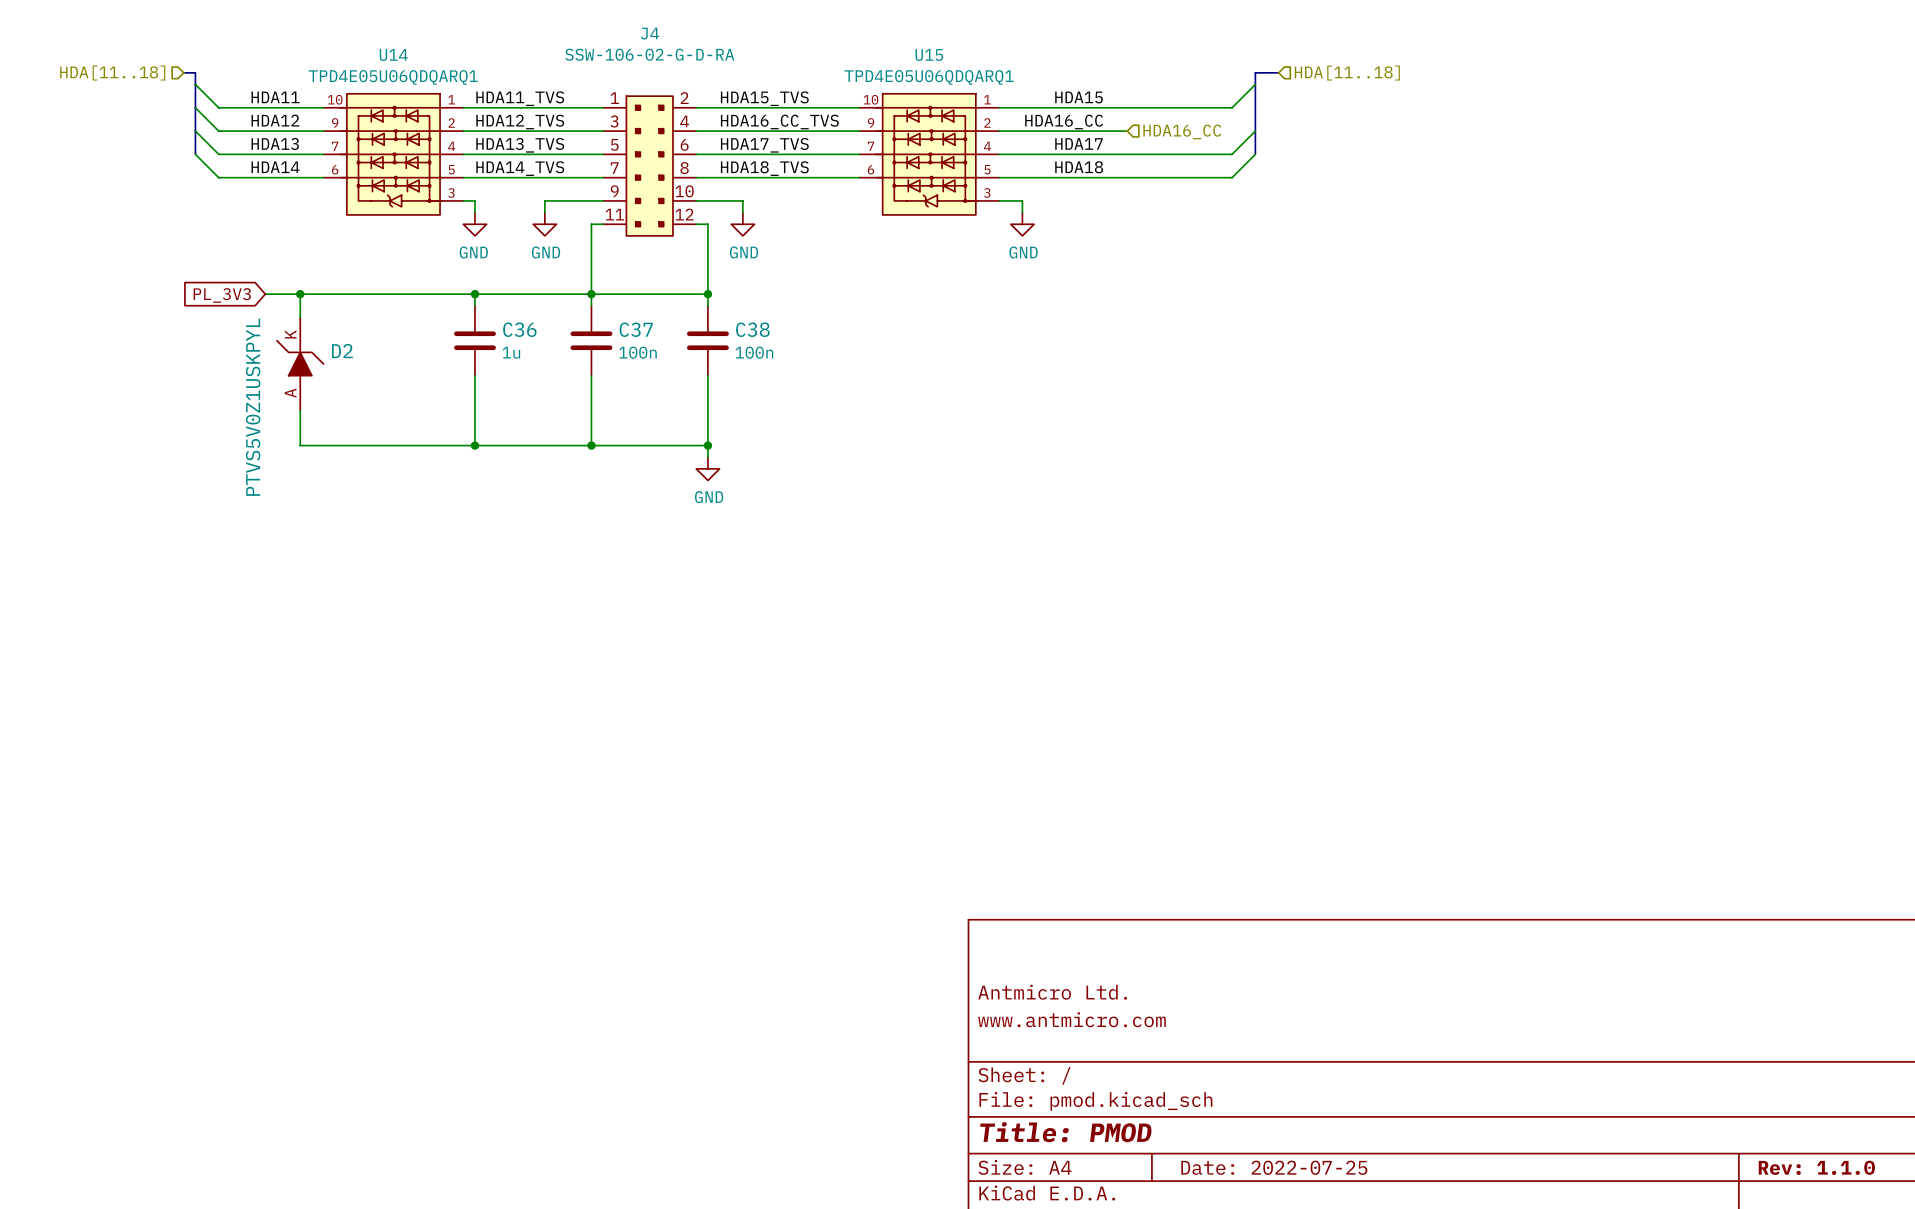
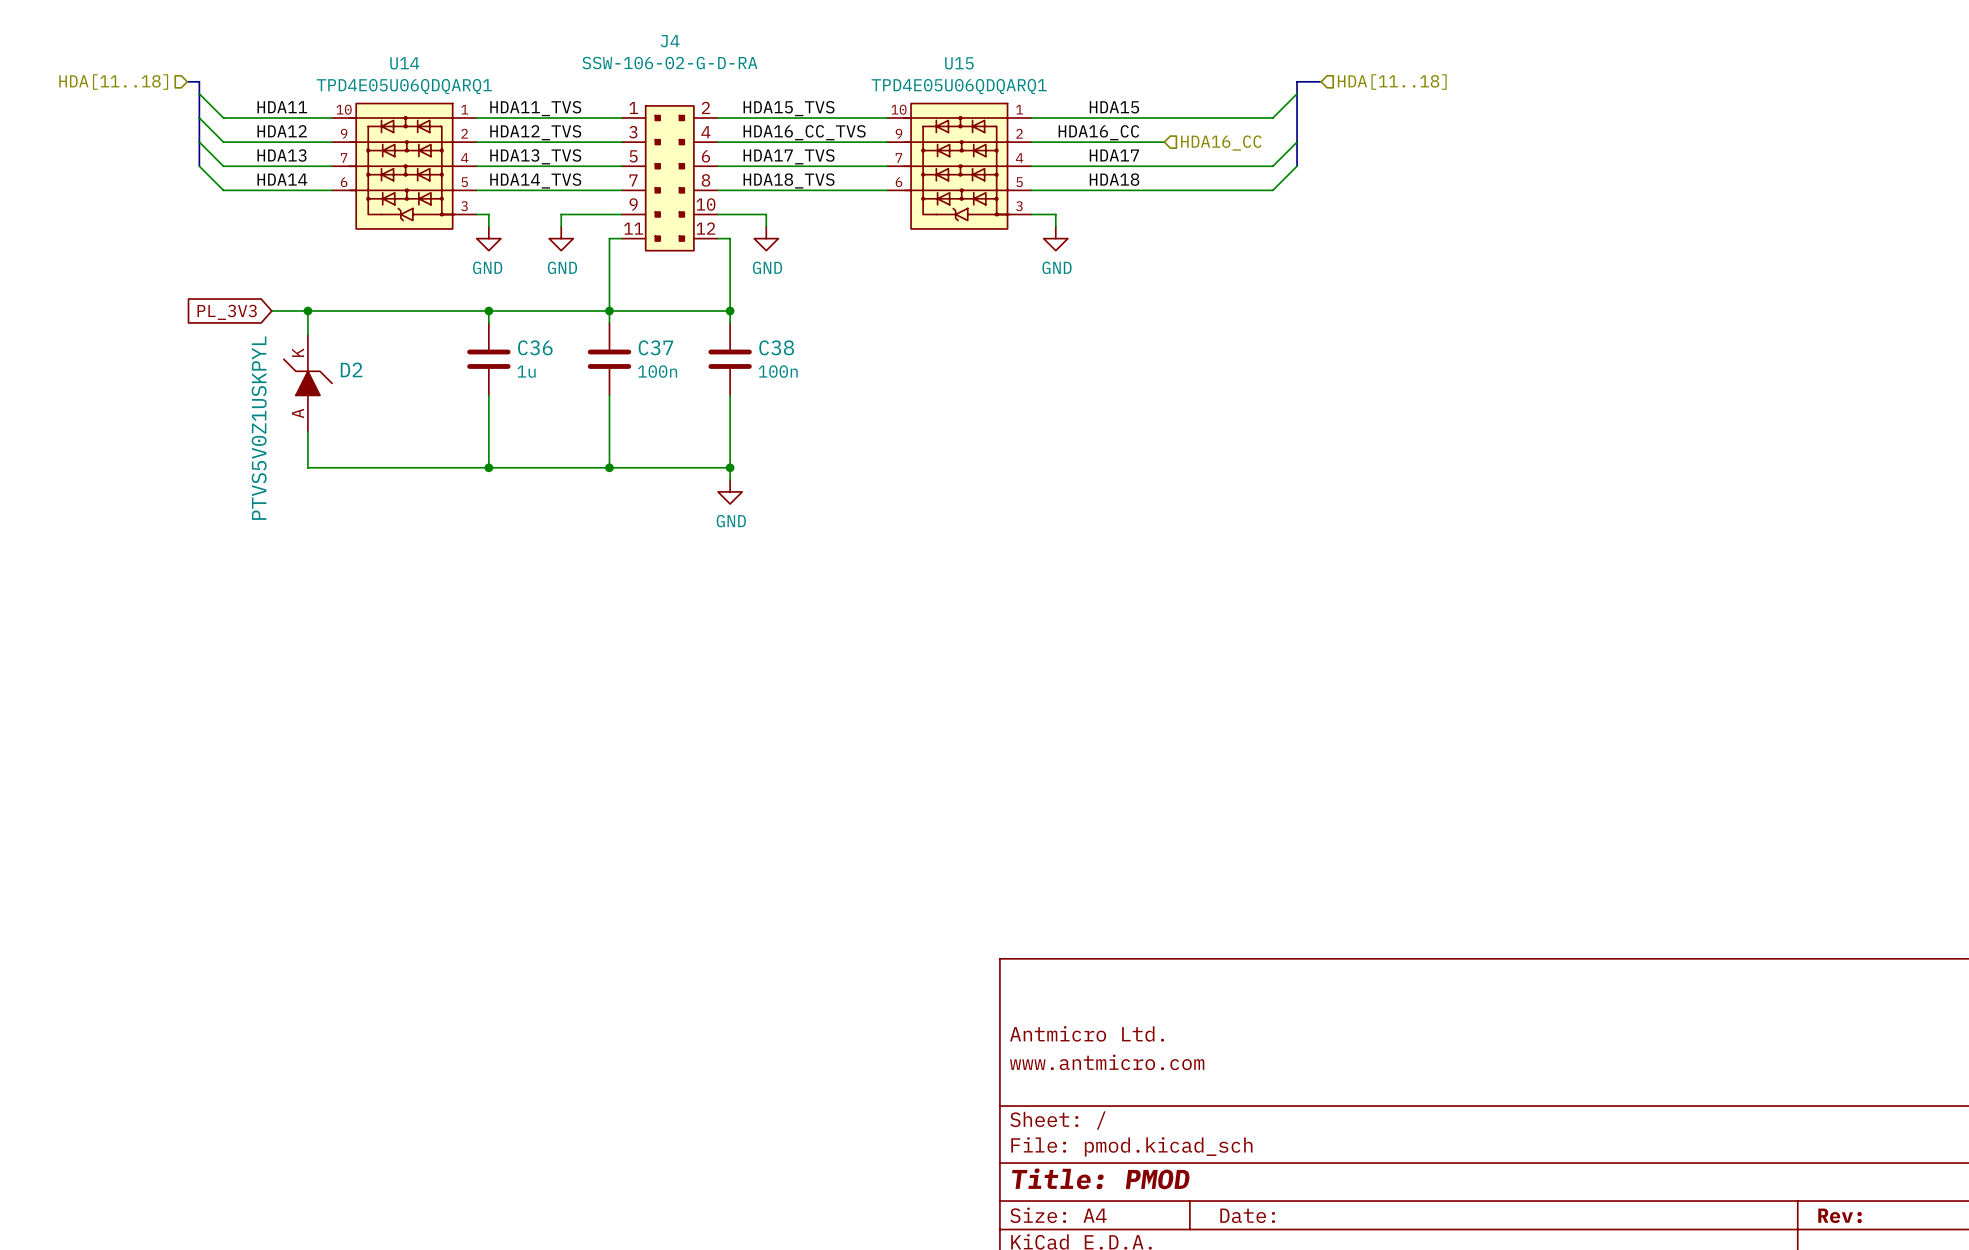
title block: Date: 2022-07-25 (1274, 1167) -> Date: (1247, 1215)
title block: Rev: 1.1.0 (1816, 1167) -> Rev: (1840, 1215)

